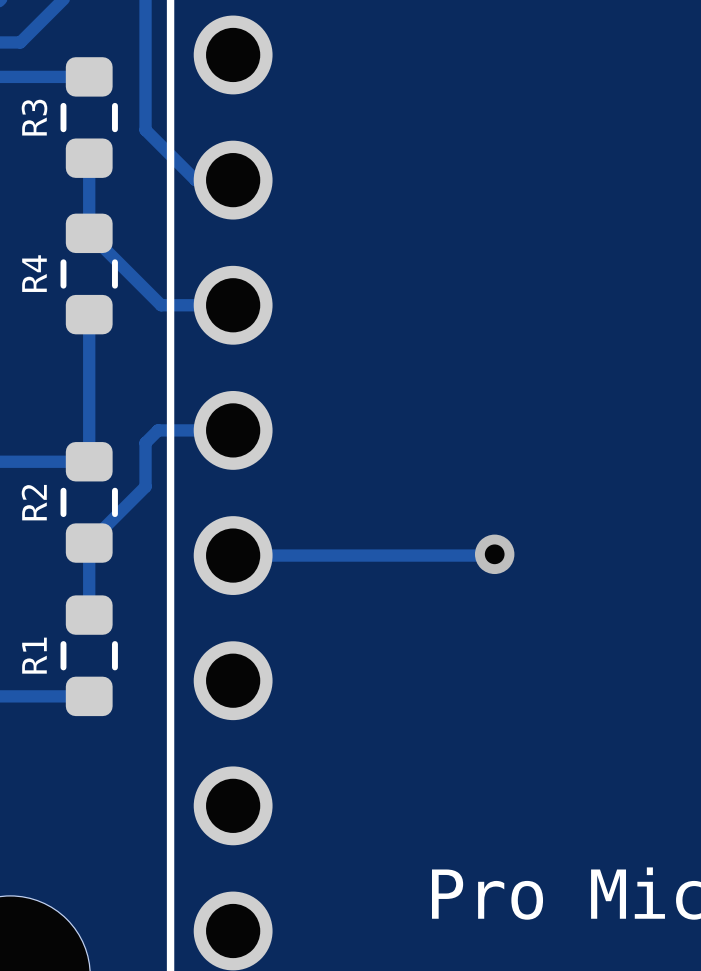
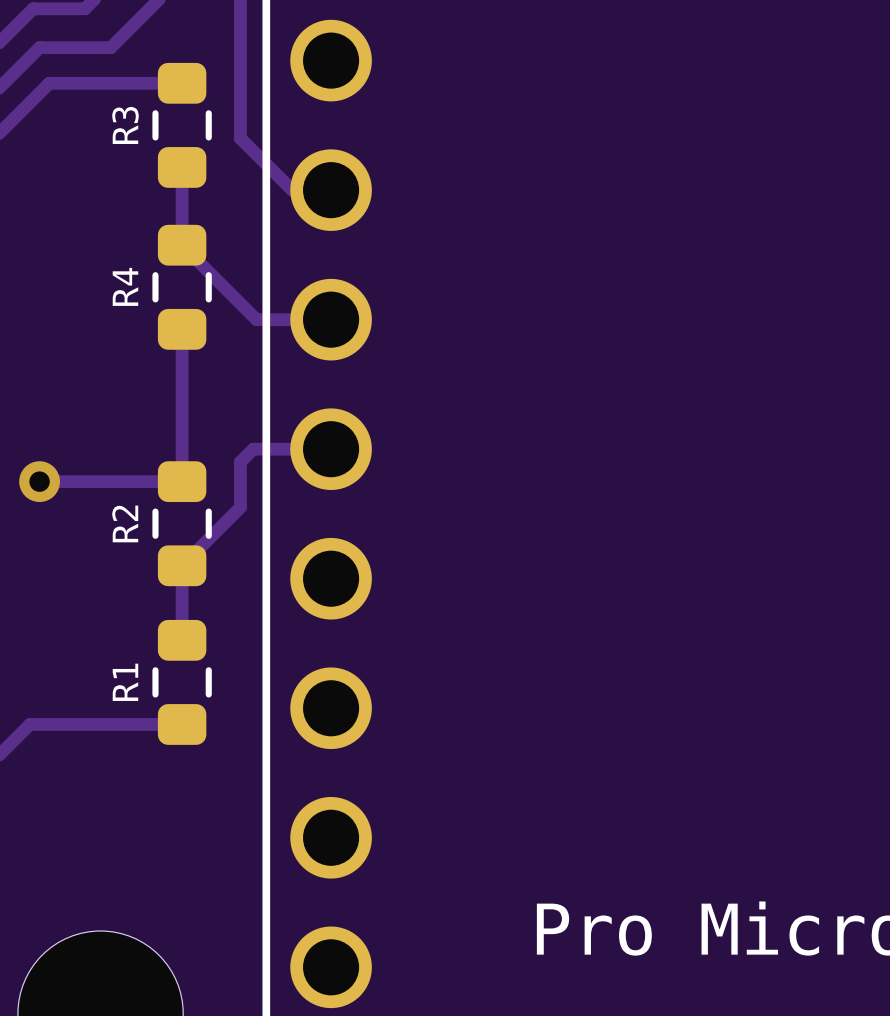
track: (494, 554) (233, 555) -> none
via: (494, 554) -> none

